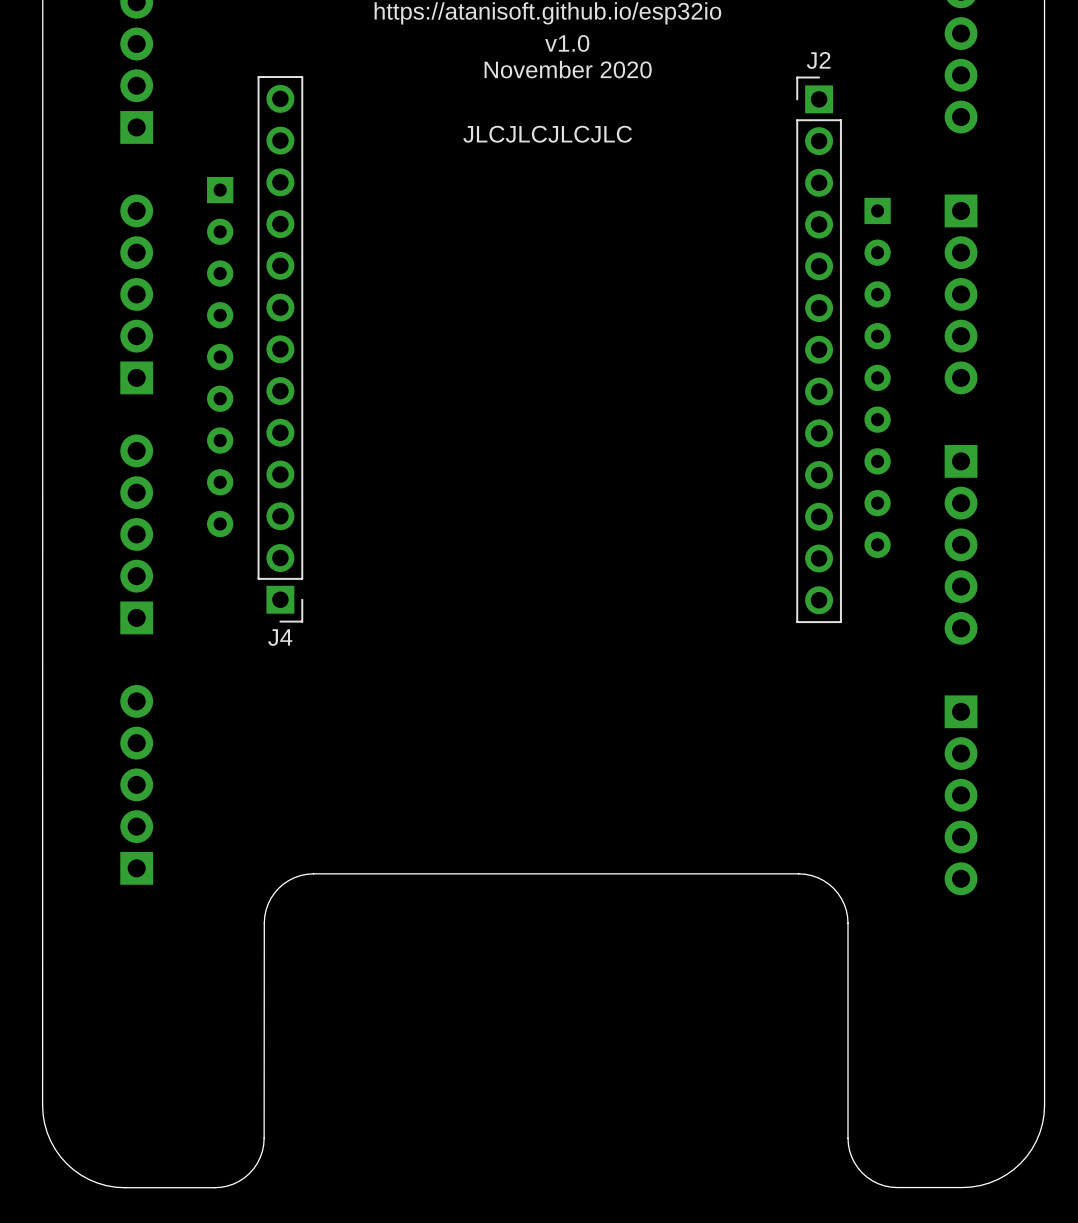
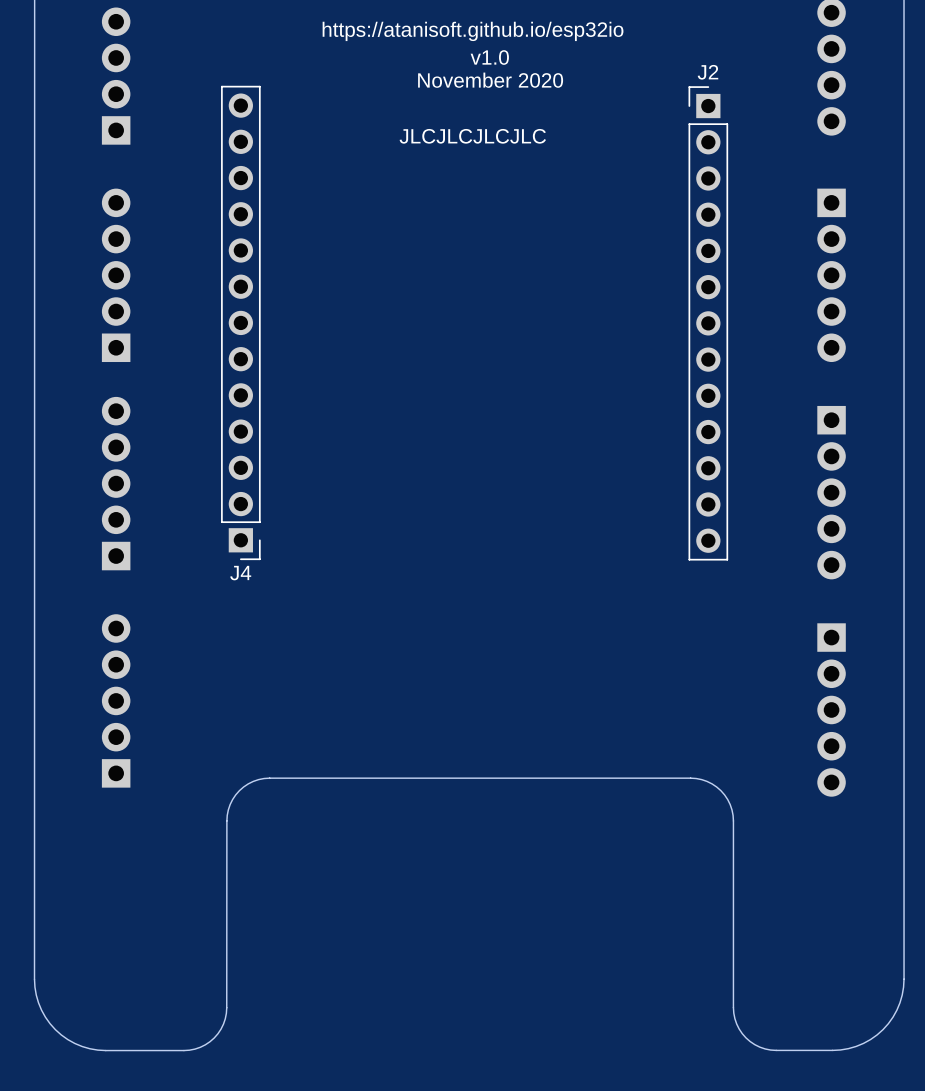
part: (220, 357) -> none
part: (877, 377) -> none

